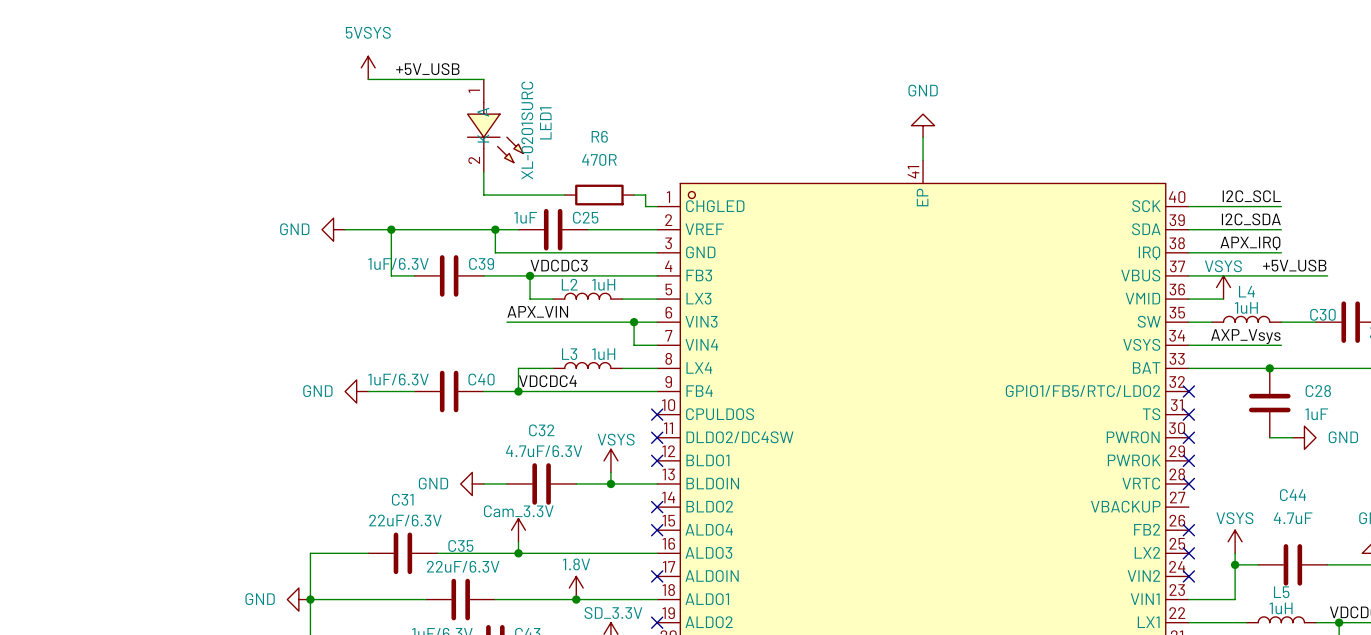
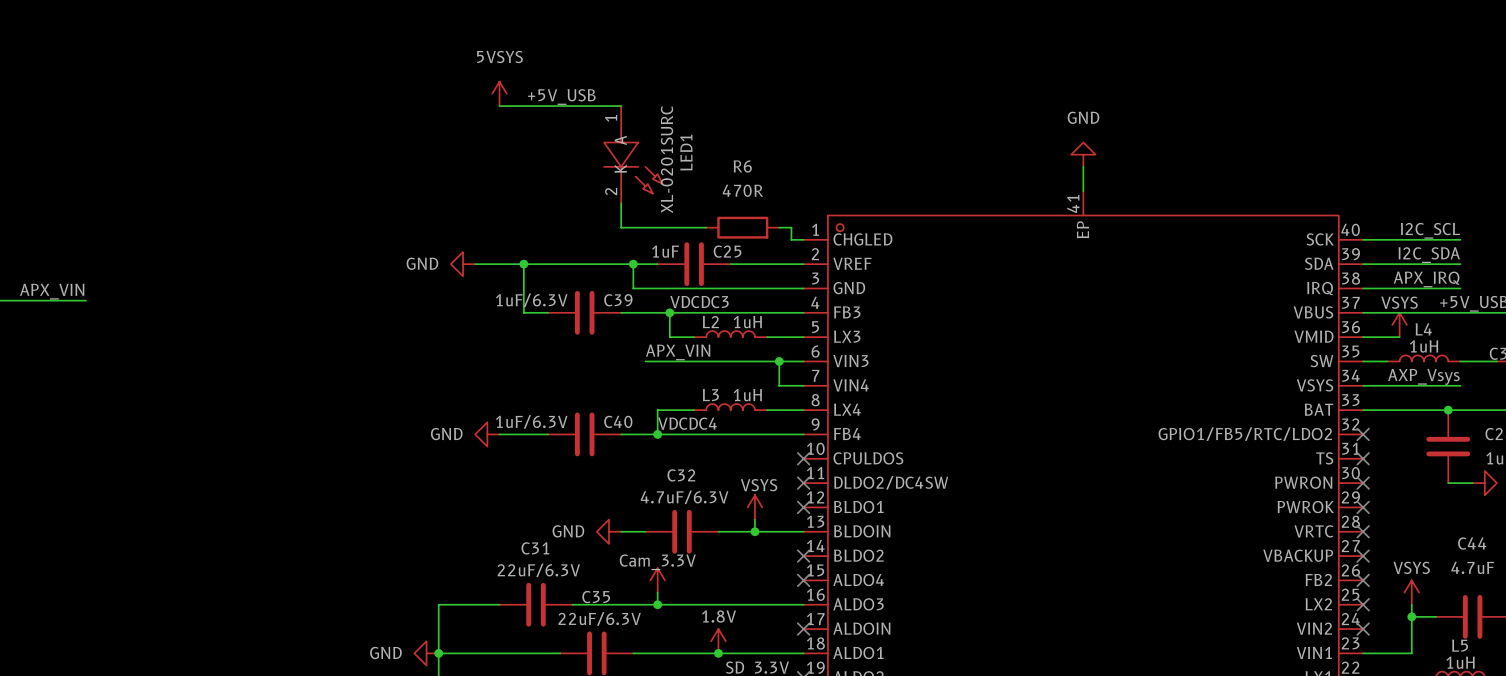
no-connect mark: none -> (1363, 556)

